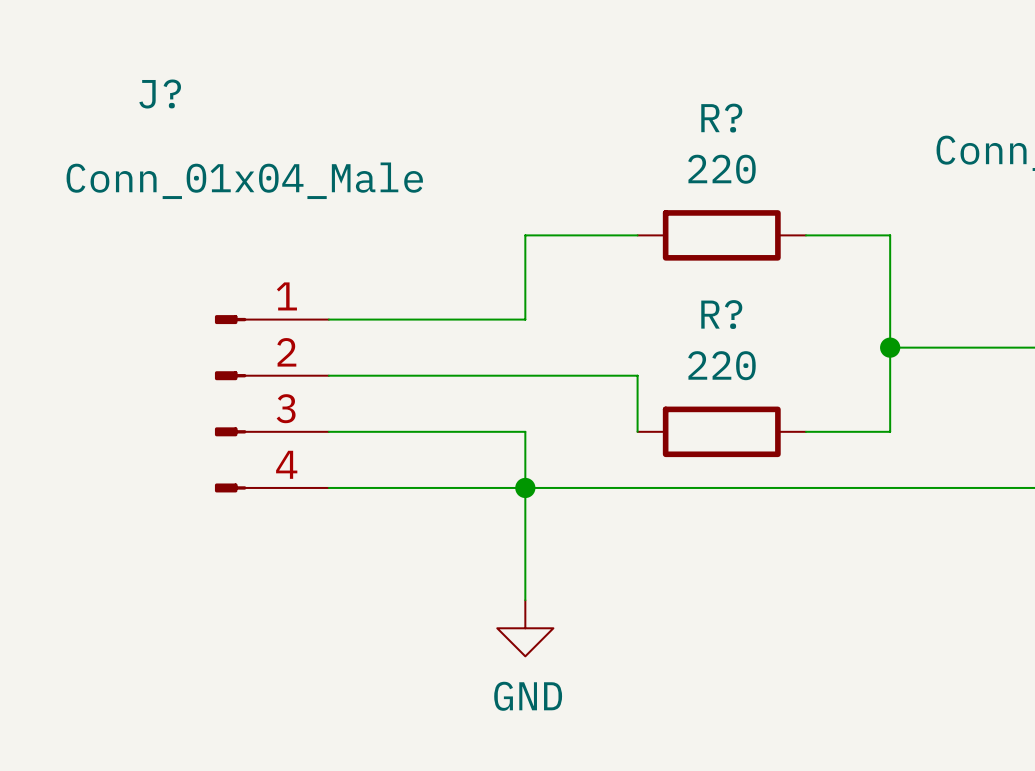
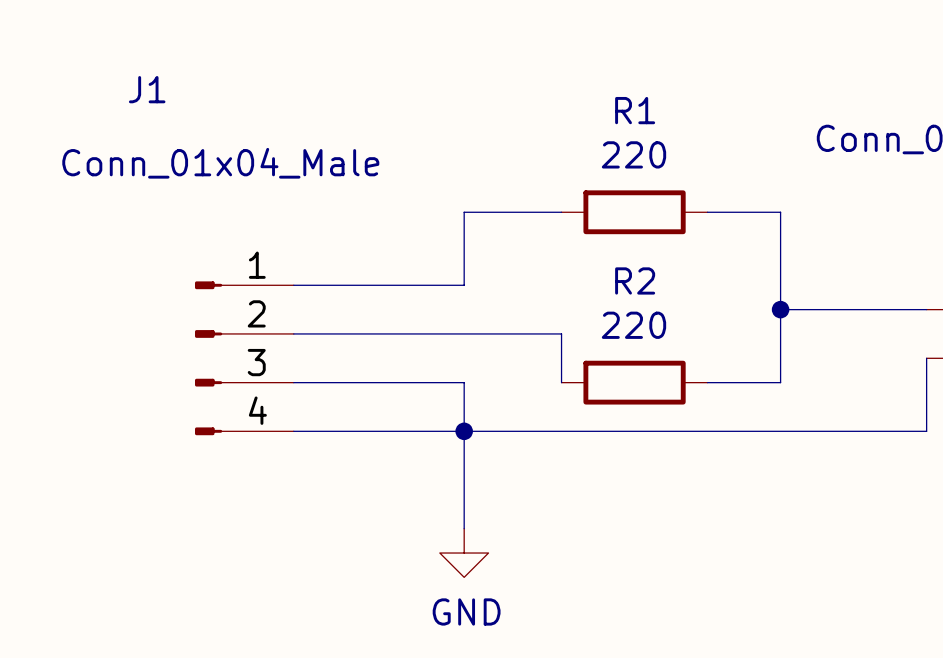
J? name: J? (160, 94) -> J1 (147, 89)
R? name: R? (721, 118) -> R1 (635, 110)
R? name: R? (721, 314) -> R2 (635, 280)

